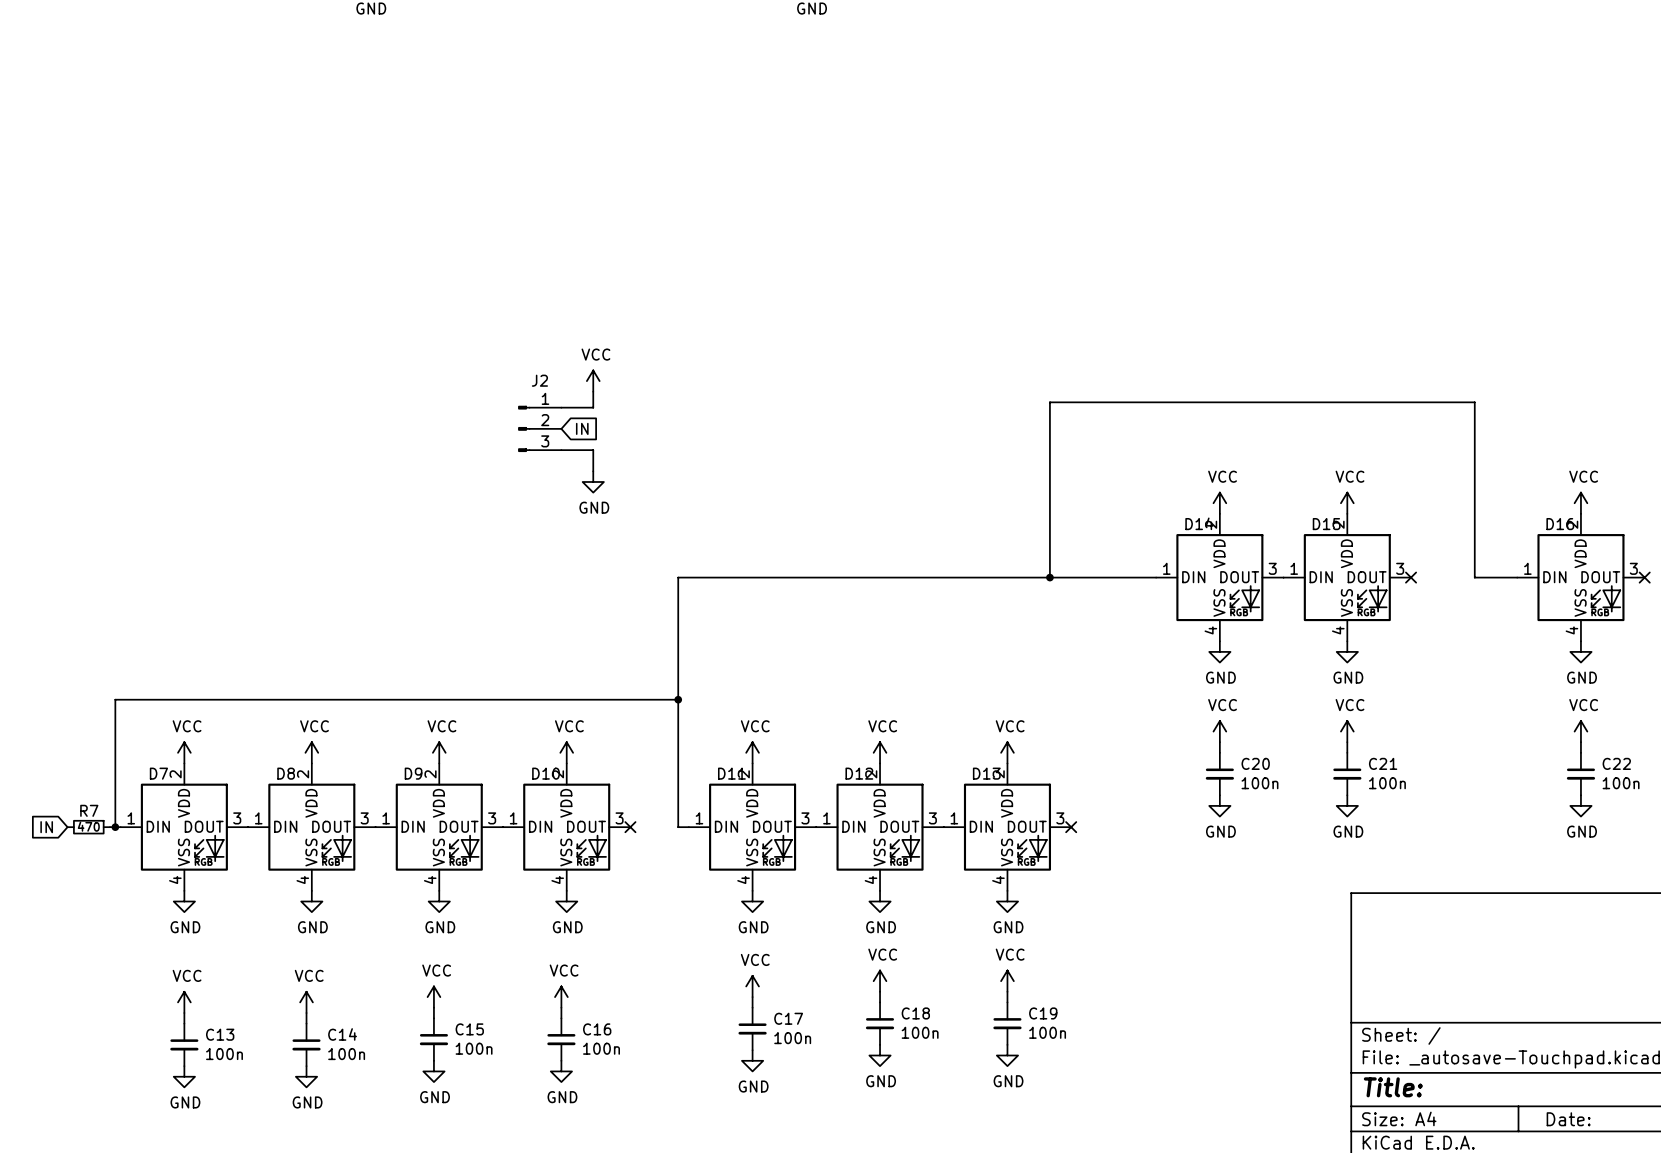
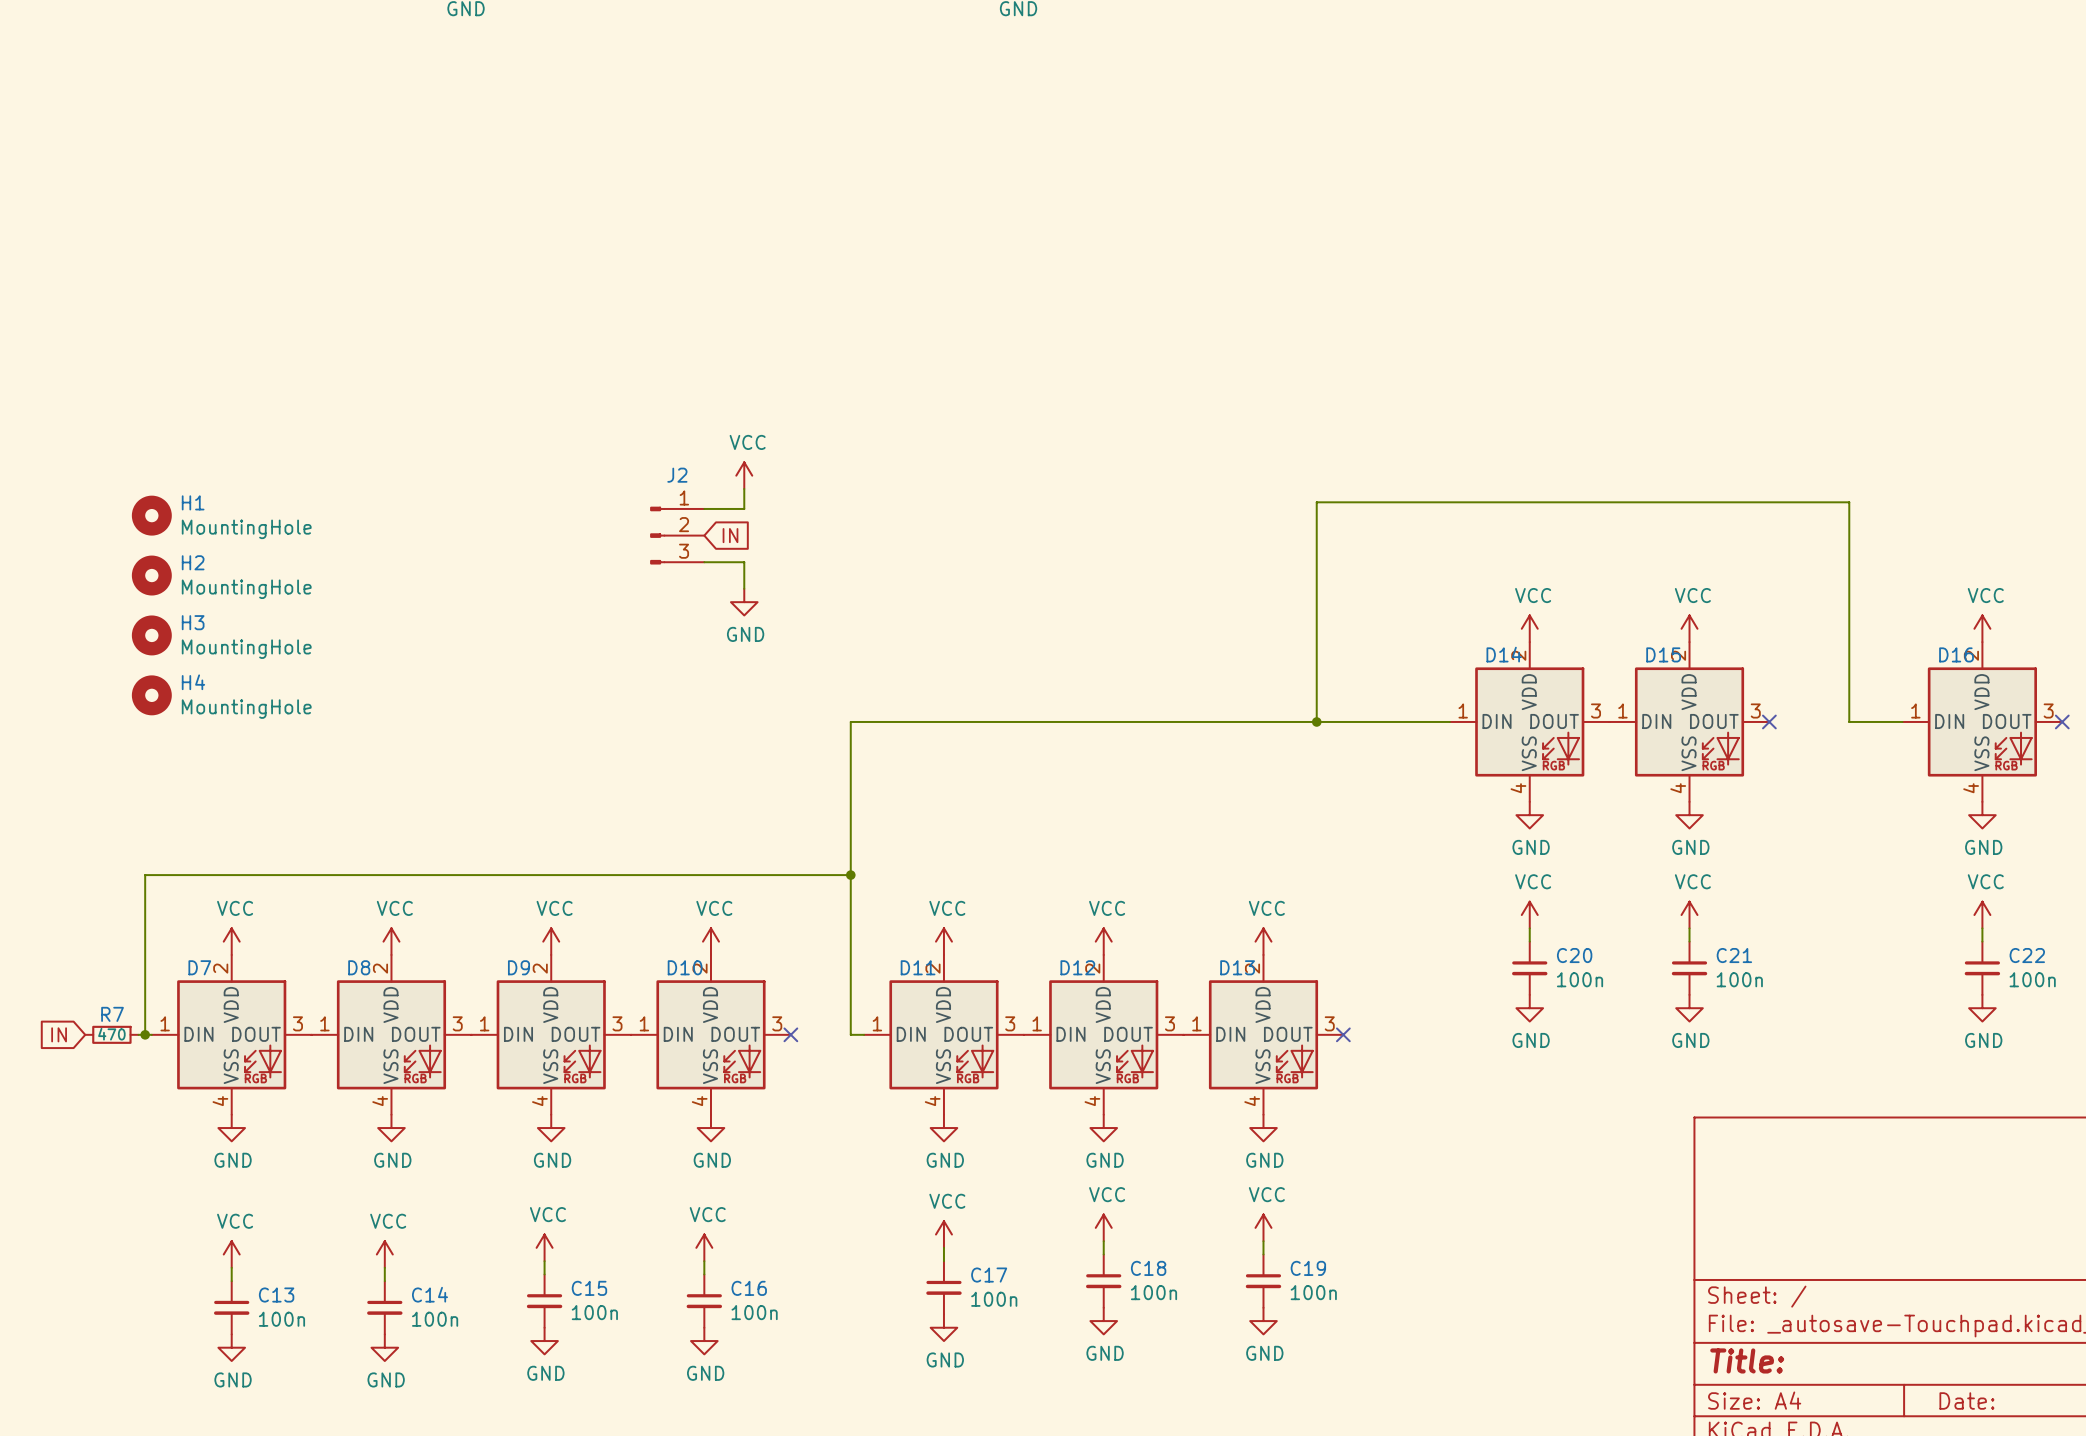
H1: none -> MountingHole (151, 515)
H2: none -> MountingHole (151, 575)
H3: none -> MountingHole (151, 635)
H4: none -> MountingHole (151, 695)

